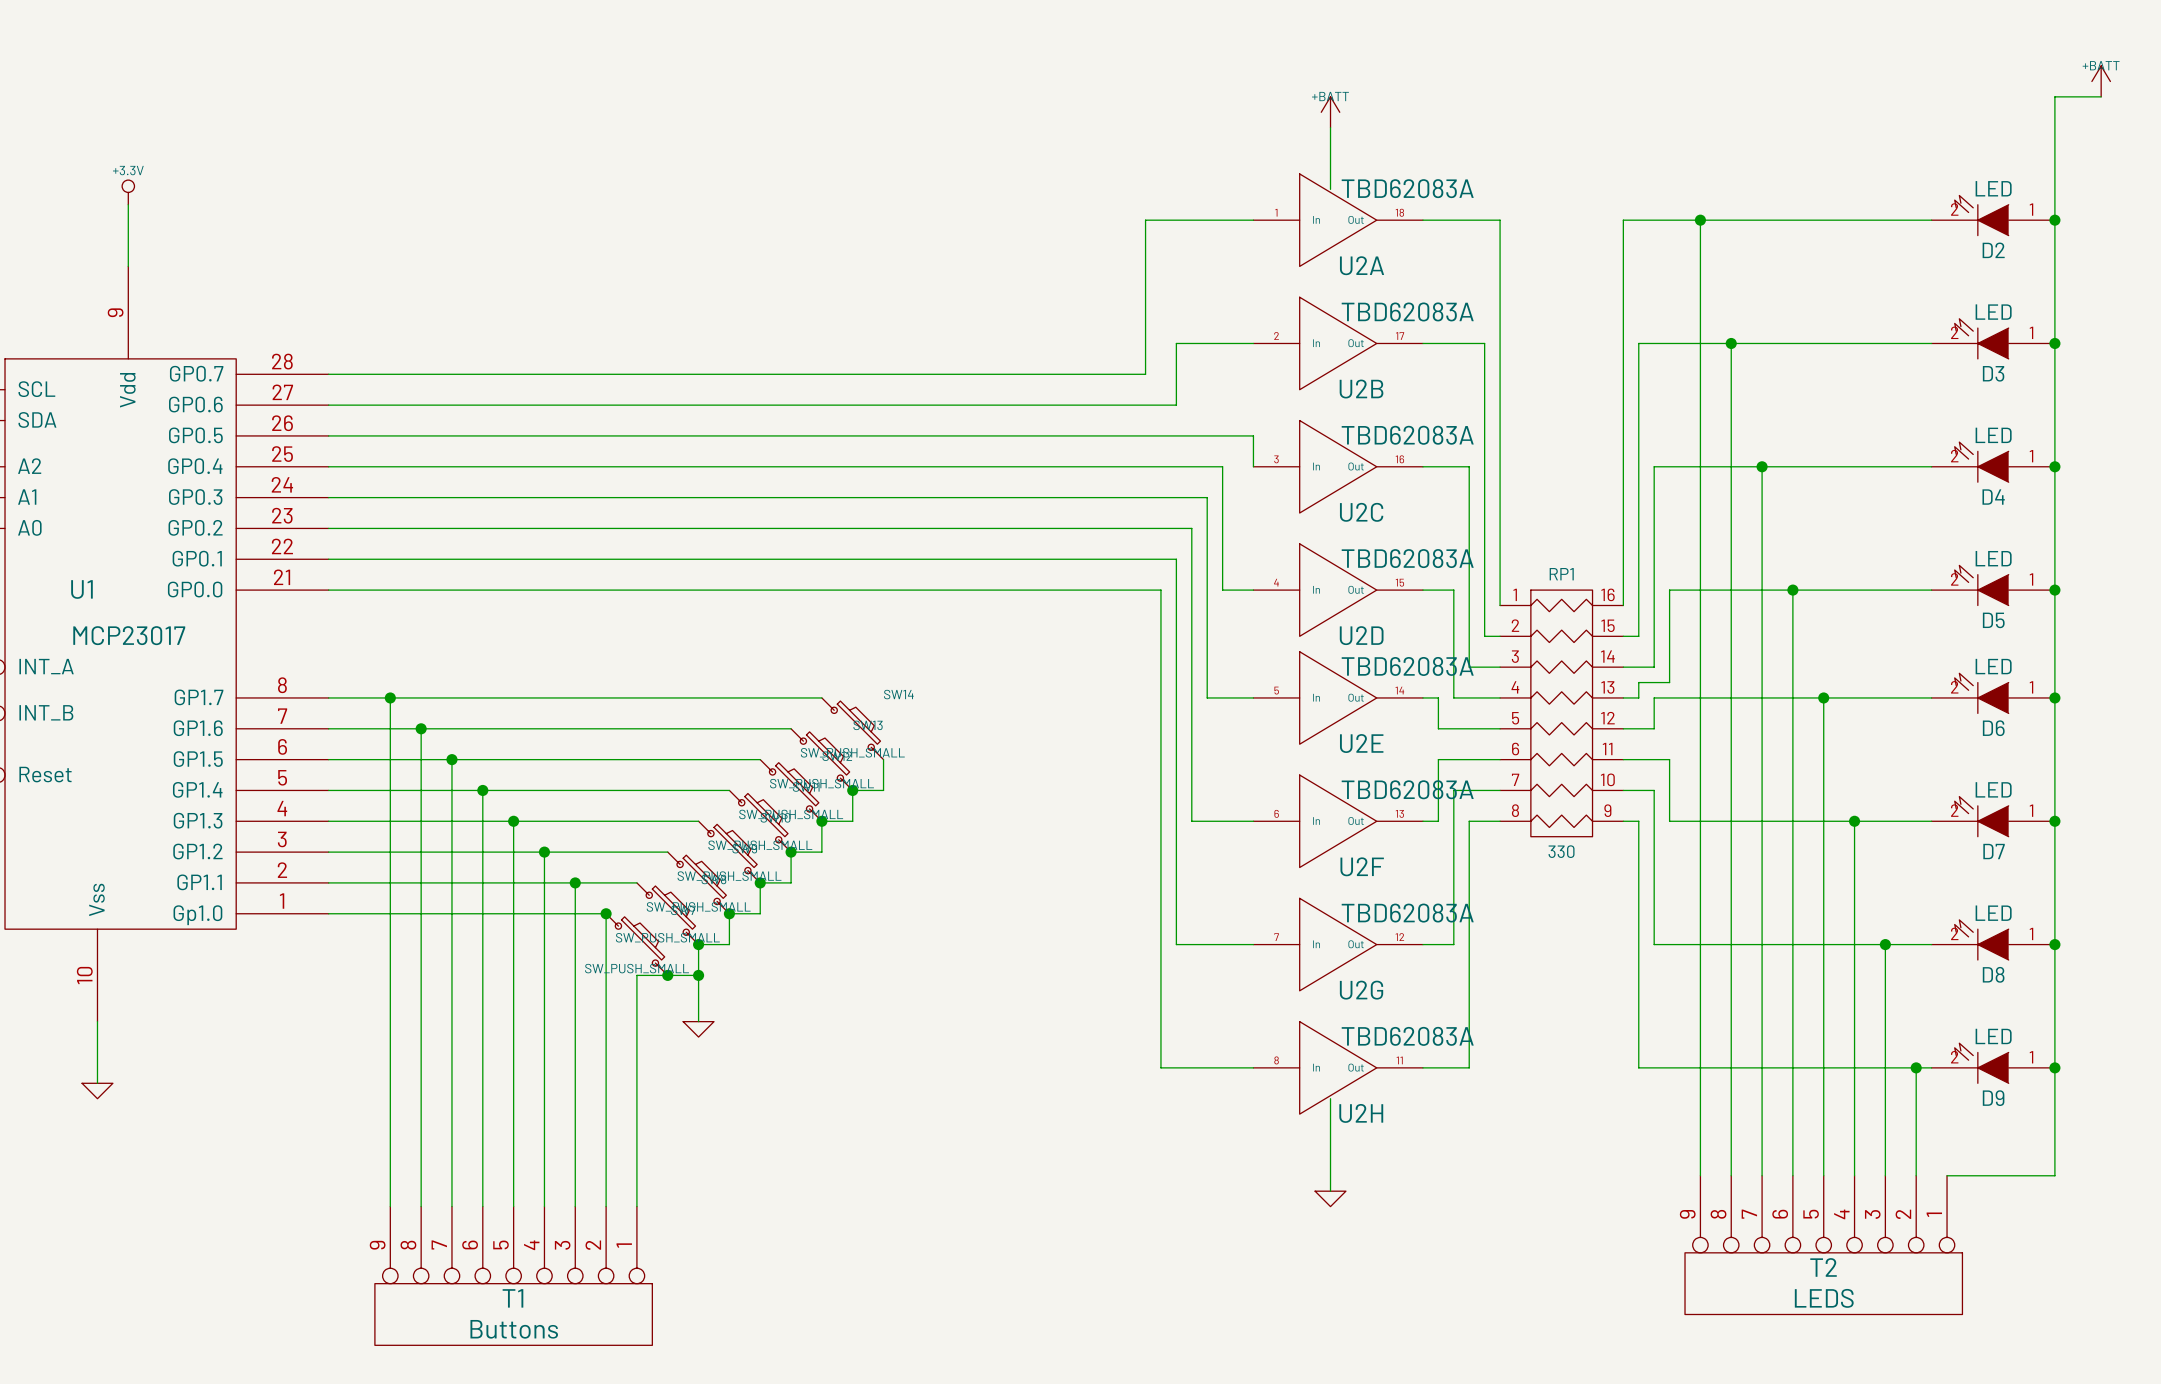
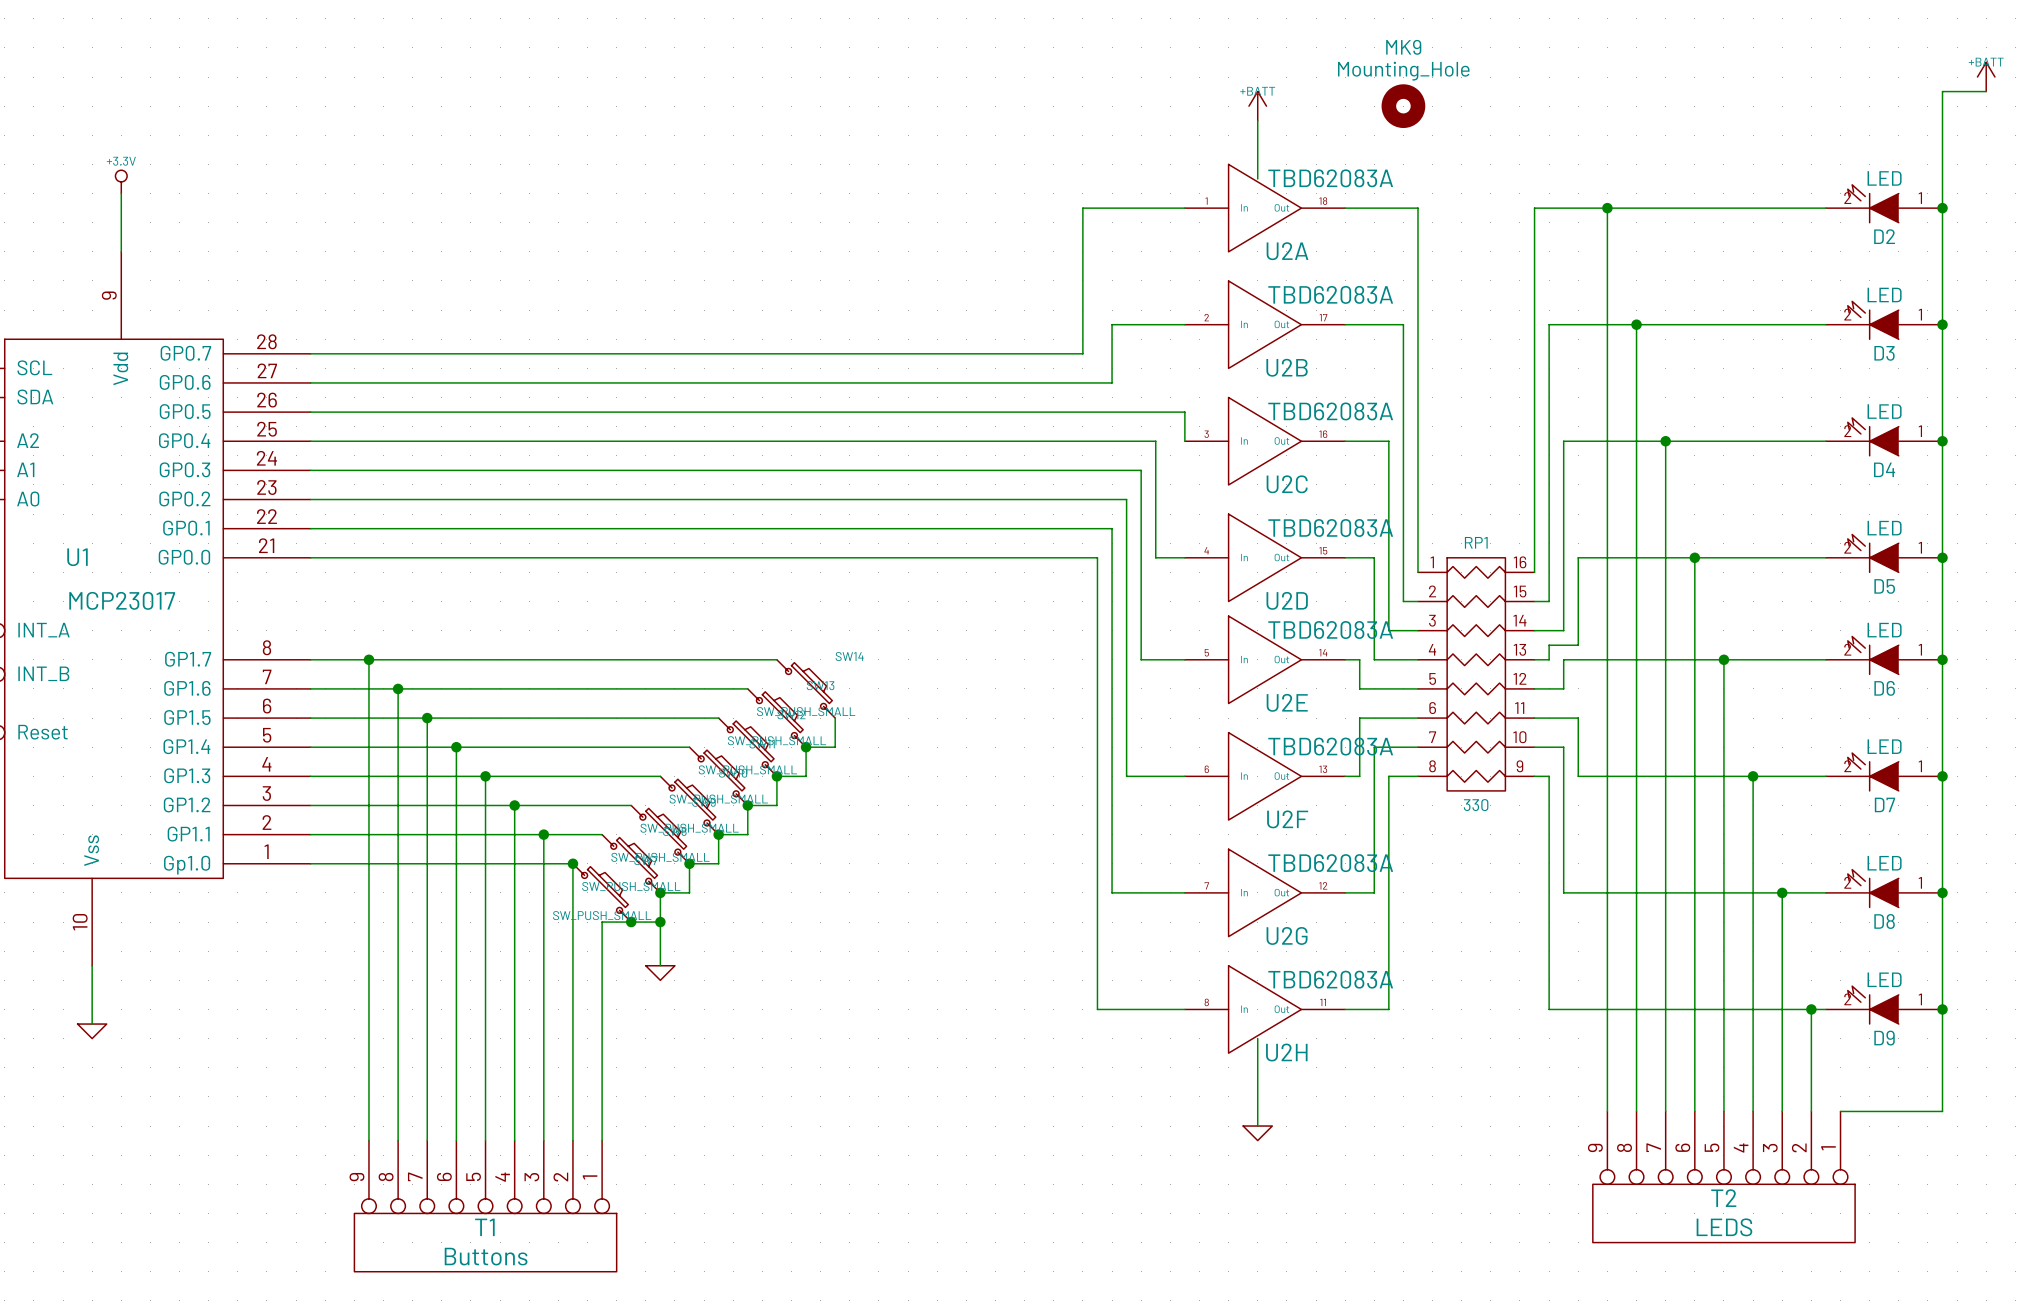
MK9: none -> Mounting_Hole (1403, 106)

